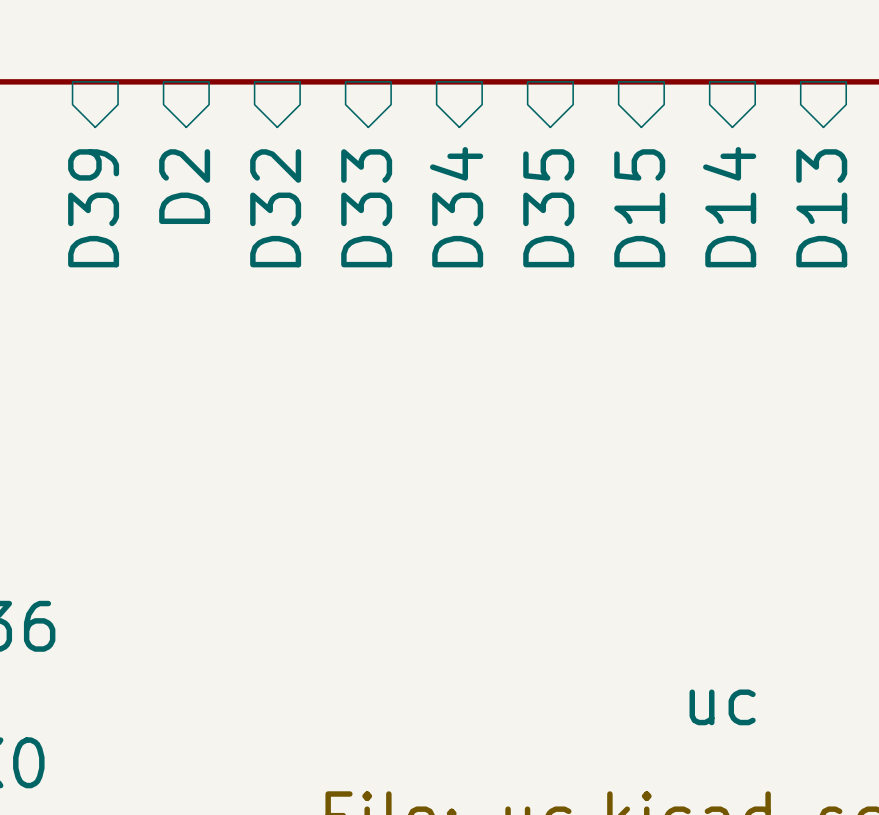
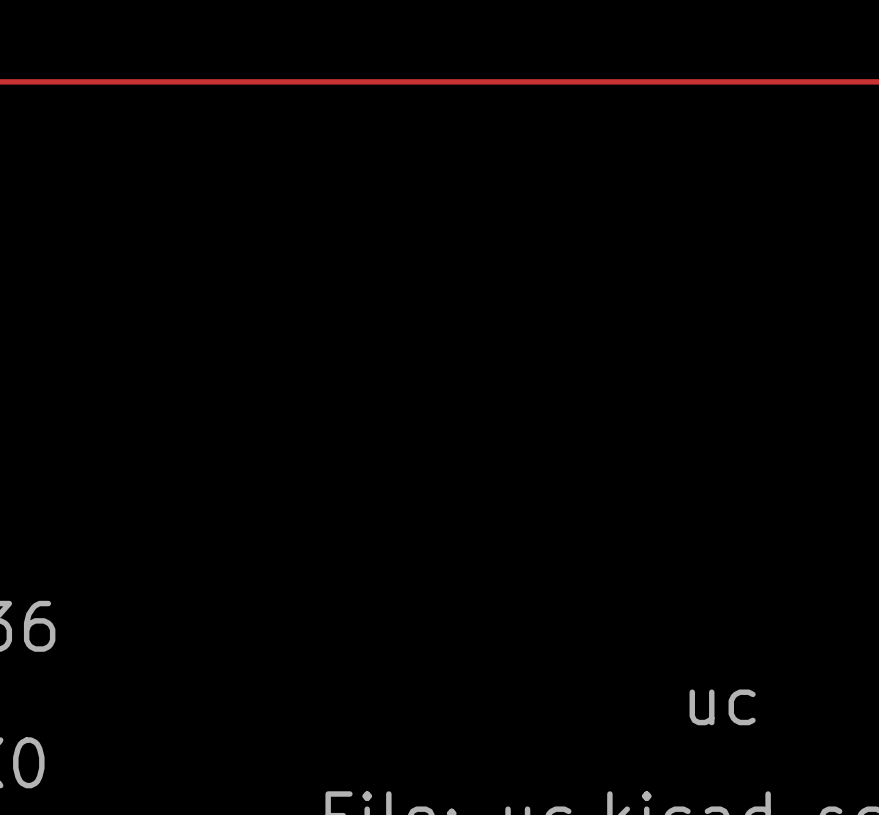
sheet pin: D2 (184, 186) -> none
sheet pin: D34 (456, 207) -> none
sheet pin: D14 (729, 207) -> none
sheet pin: D39 (93, 208) -> none
sheet pin: D32 (275, 208) -> none
sheet pin: D33 (366, 208) -> none
sheet pin: D35 (548, 208) -> none
sheet pin: D15 (639, 208) -> none
sheet pin: D13 (821, 208) -> none

